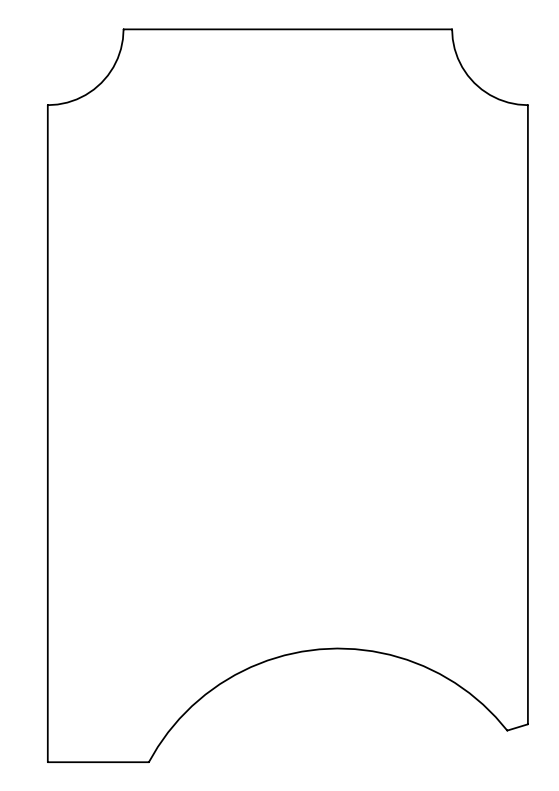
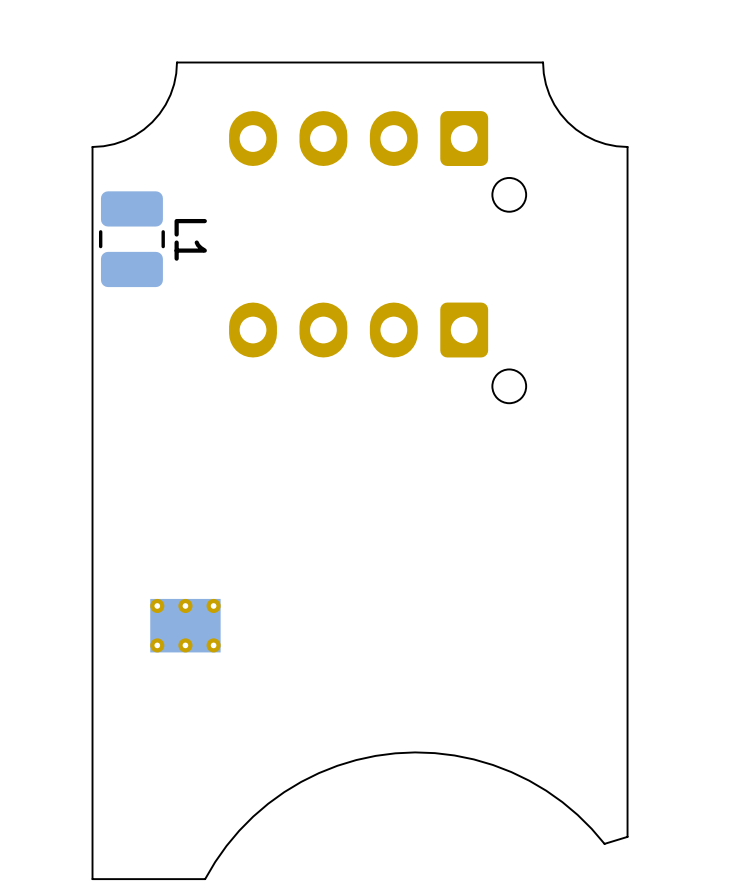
part: none -> (377, 161)
L1: none -> (131, 239)
part: none -> (377, 352)
part: none -> (185, 625)

